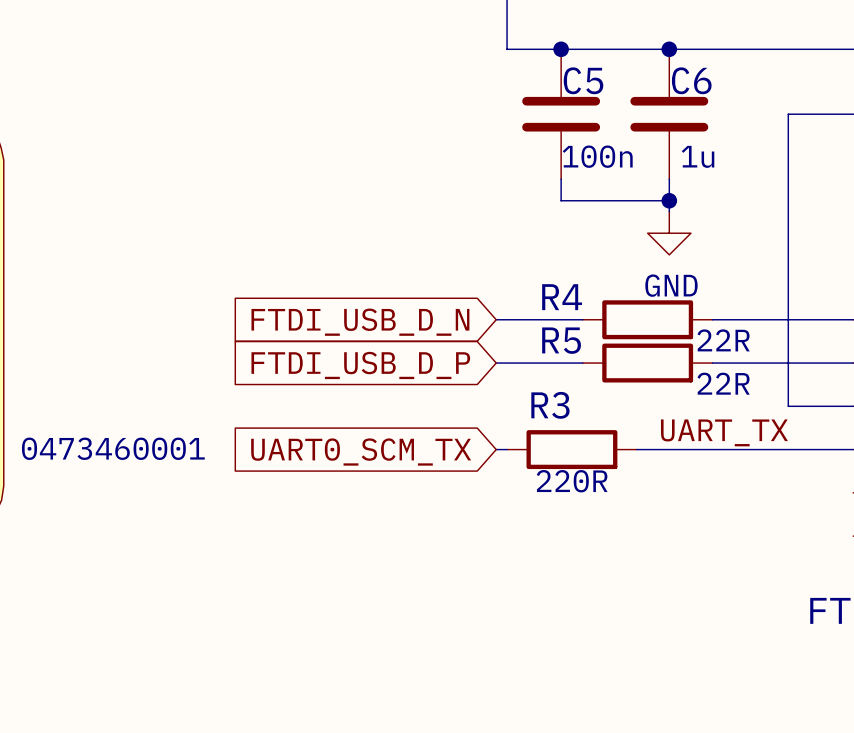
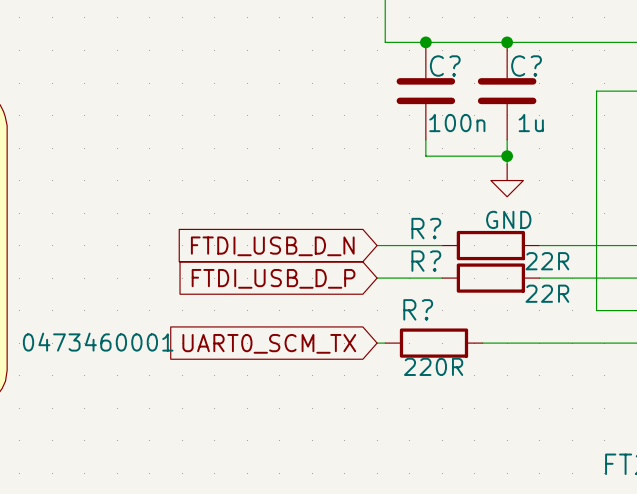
C5 name: C5 (583, 80) -> C? (445, 66)
C6 name: C6 (691, 80) -> C? (526, 66)
R4 name: R4 (562, 297) -> R? (426, 228)
R5 name: R5 (561, 340) -> R? (426, 261)
R3 name: R3 (550, 405) -> R? (418, 309)
label: UART_TX (724, 432) -> none

